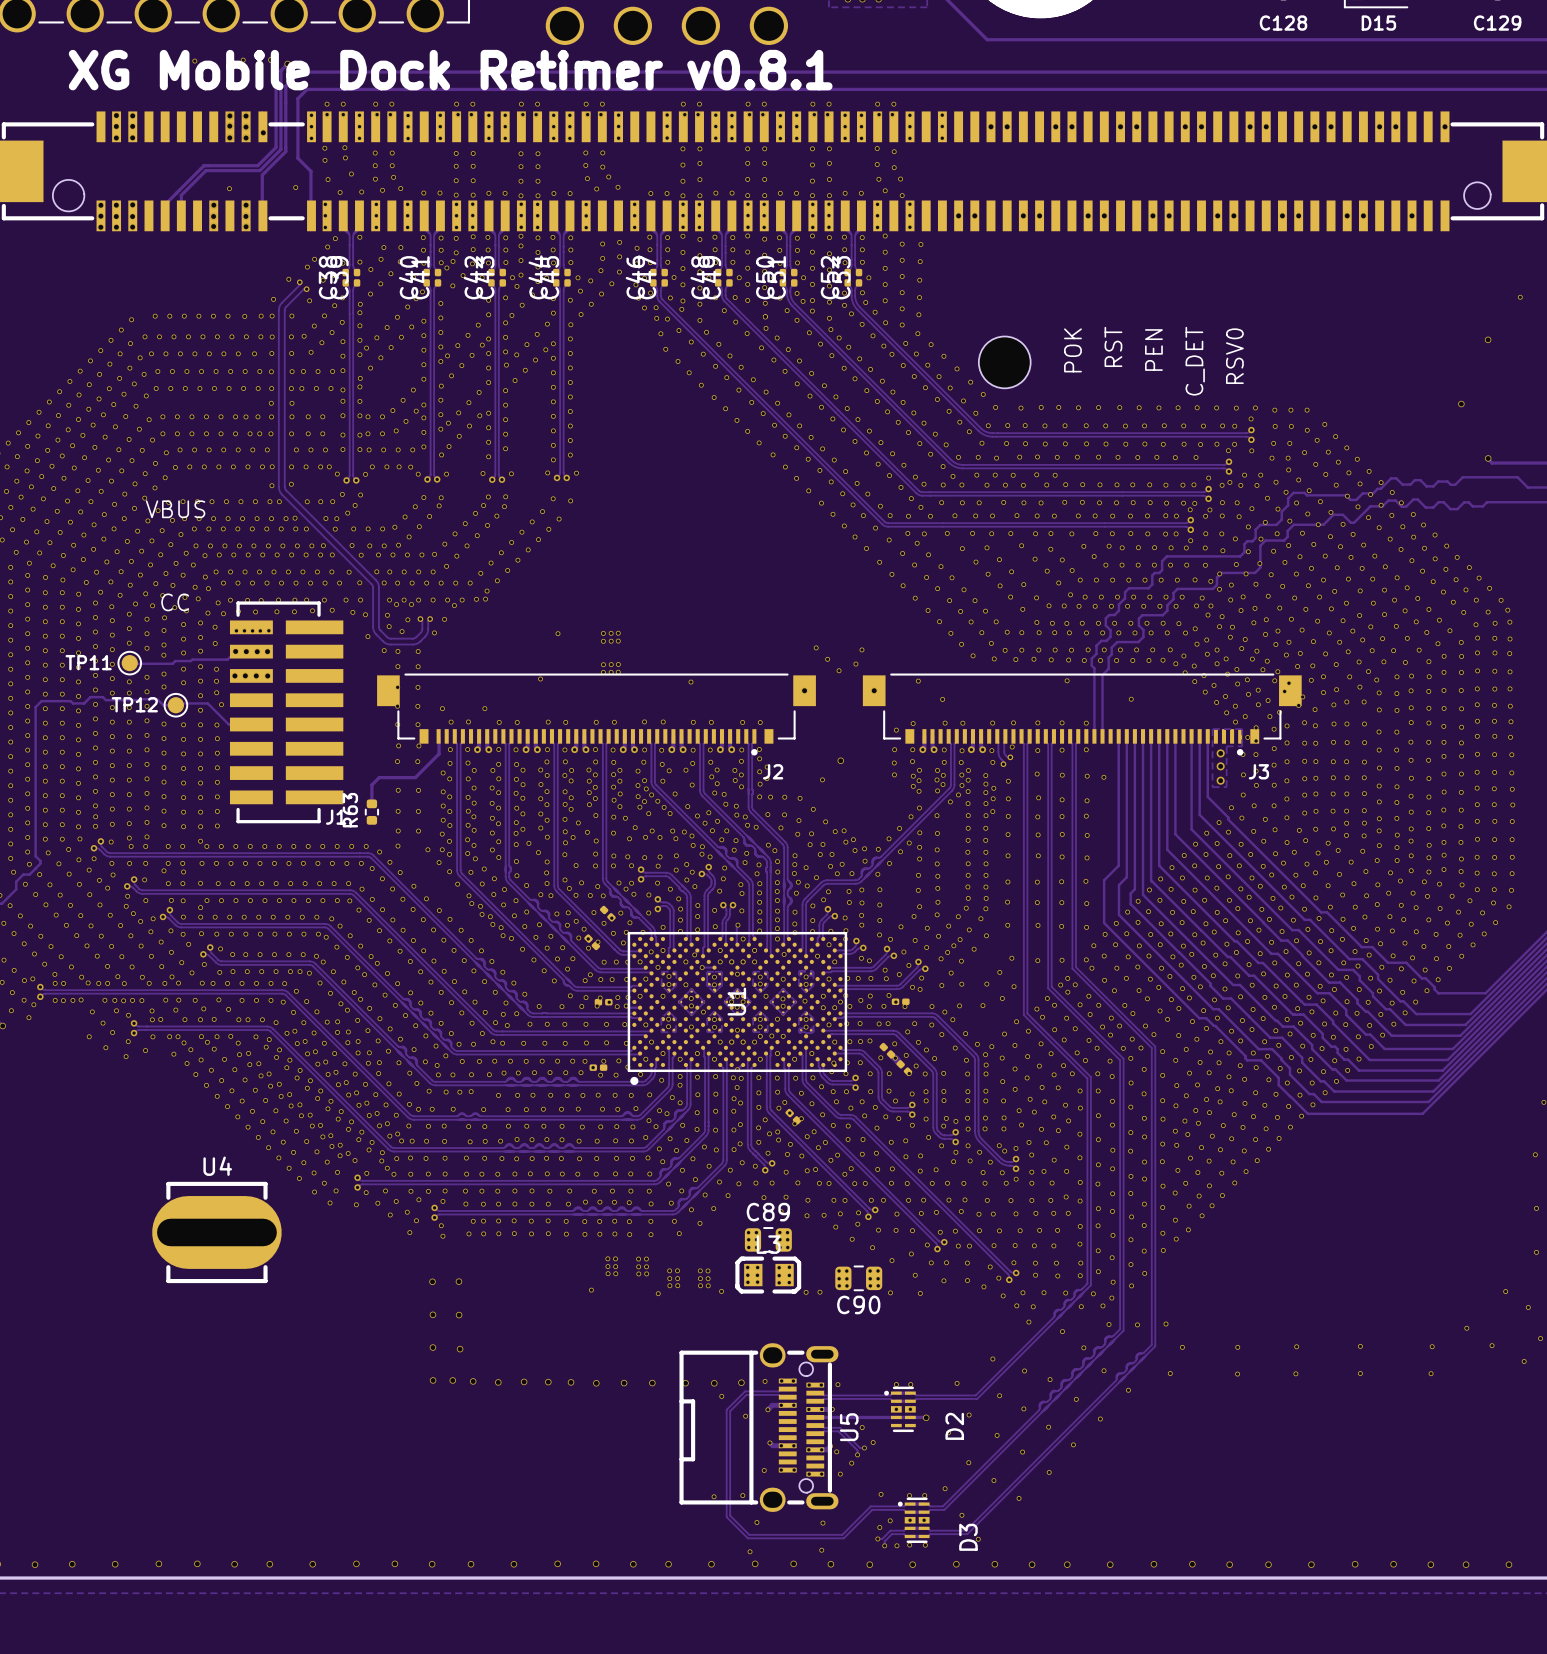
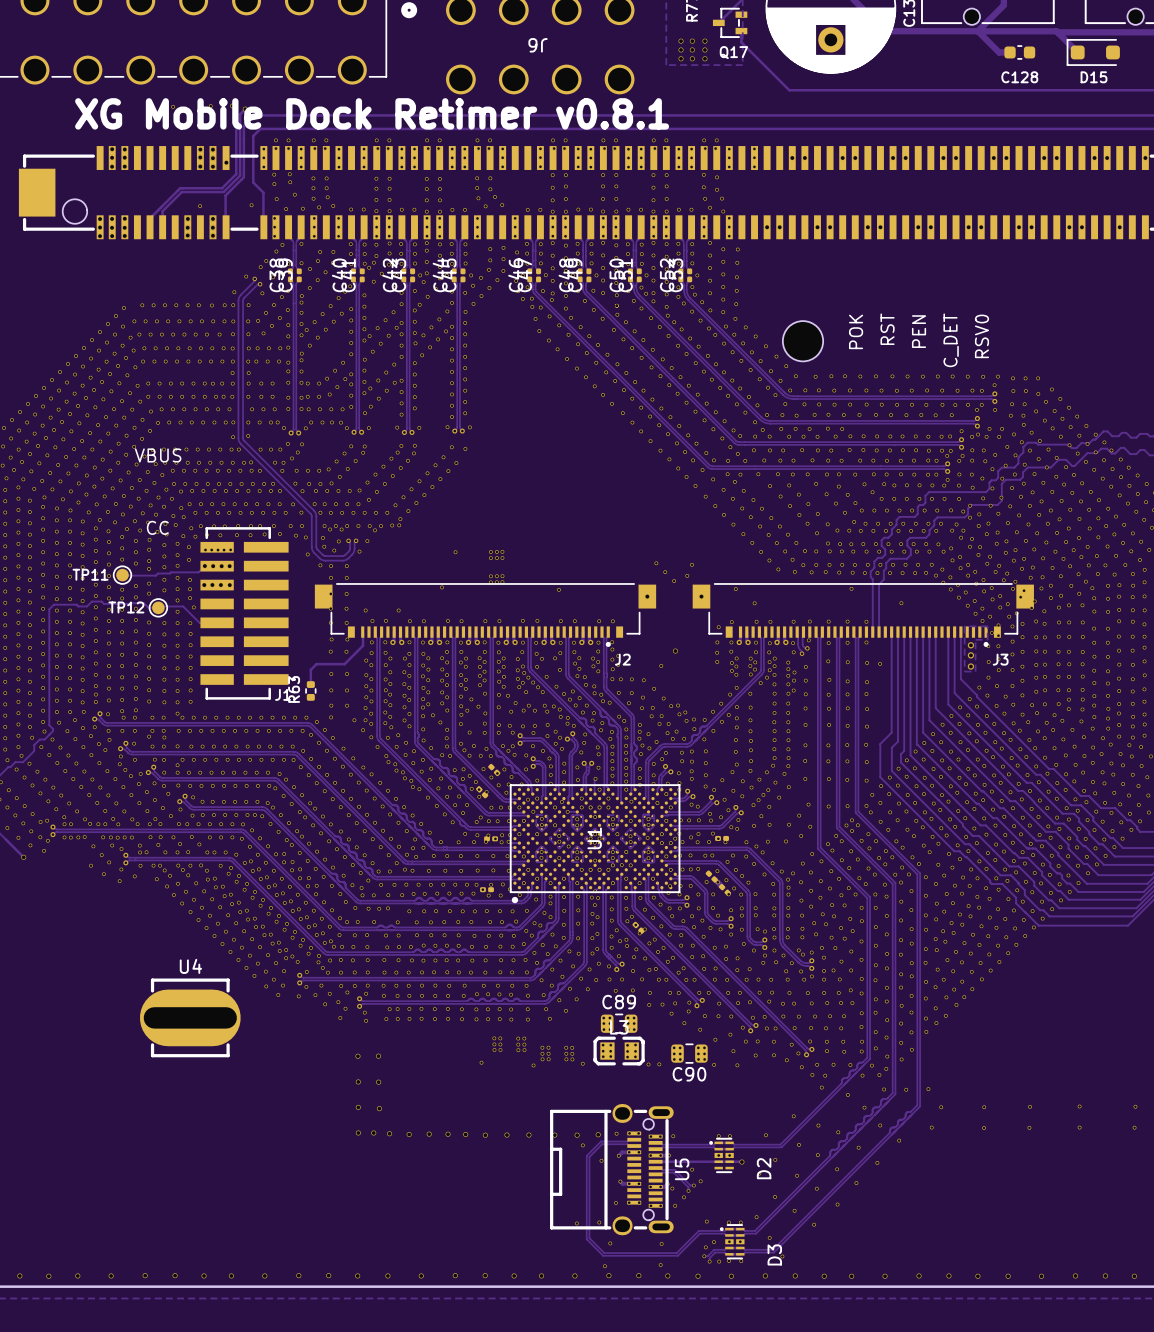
via: (943, 1126) -> none

